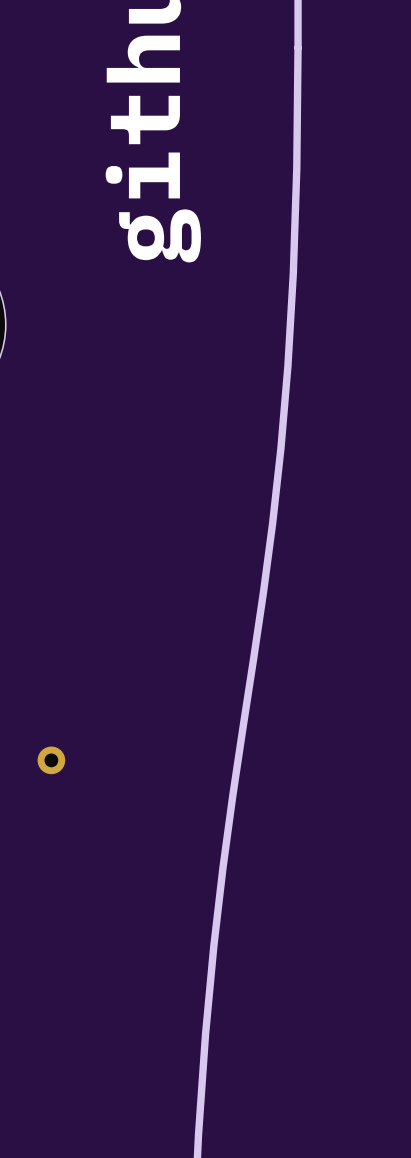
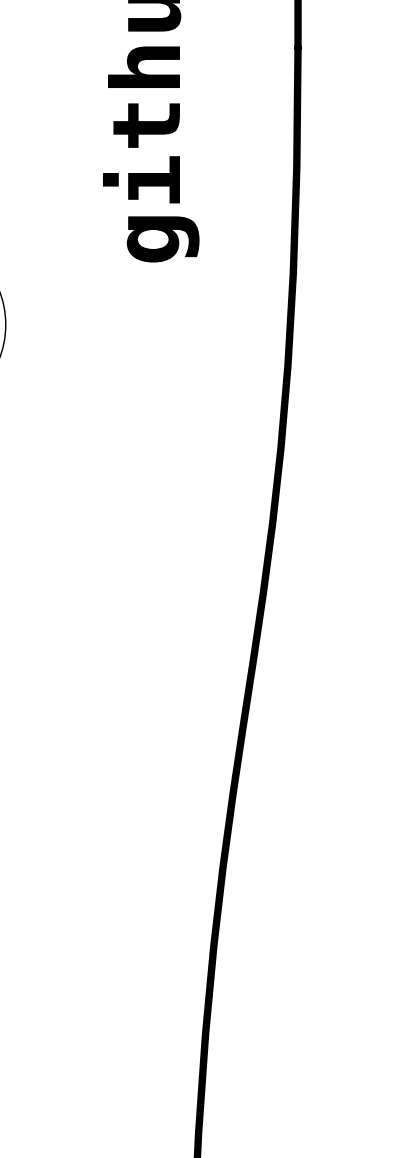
via: (51, 760) -> none

